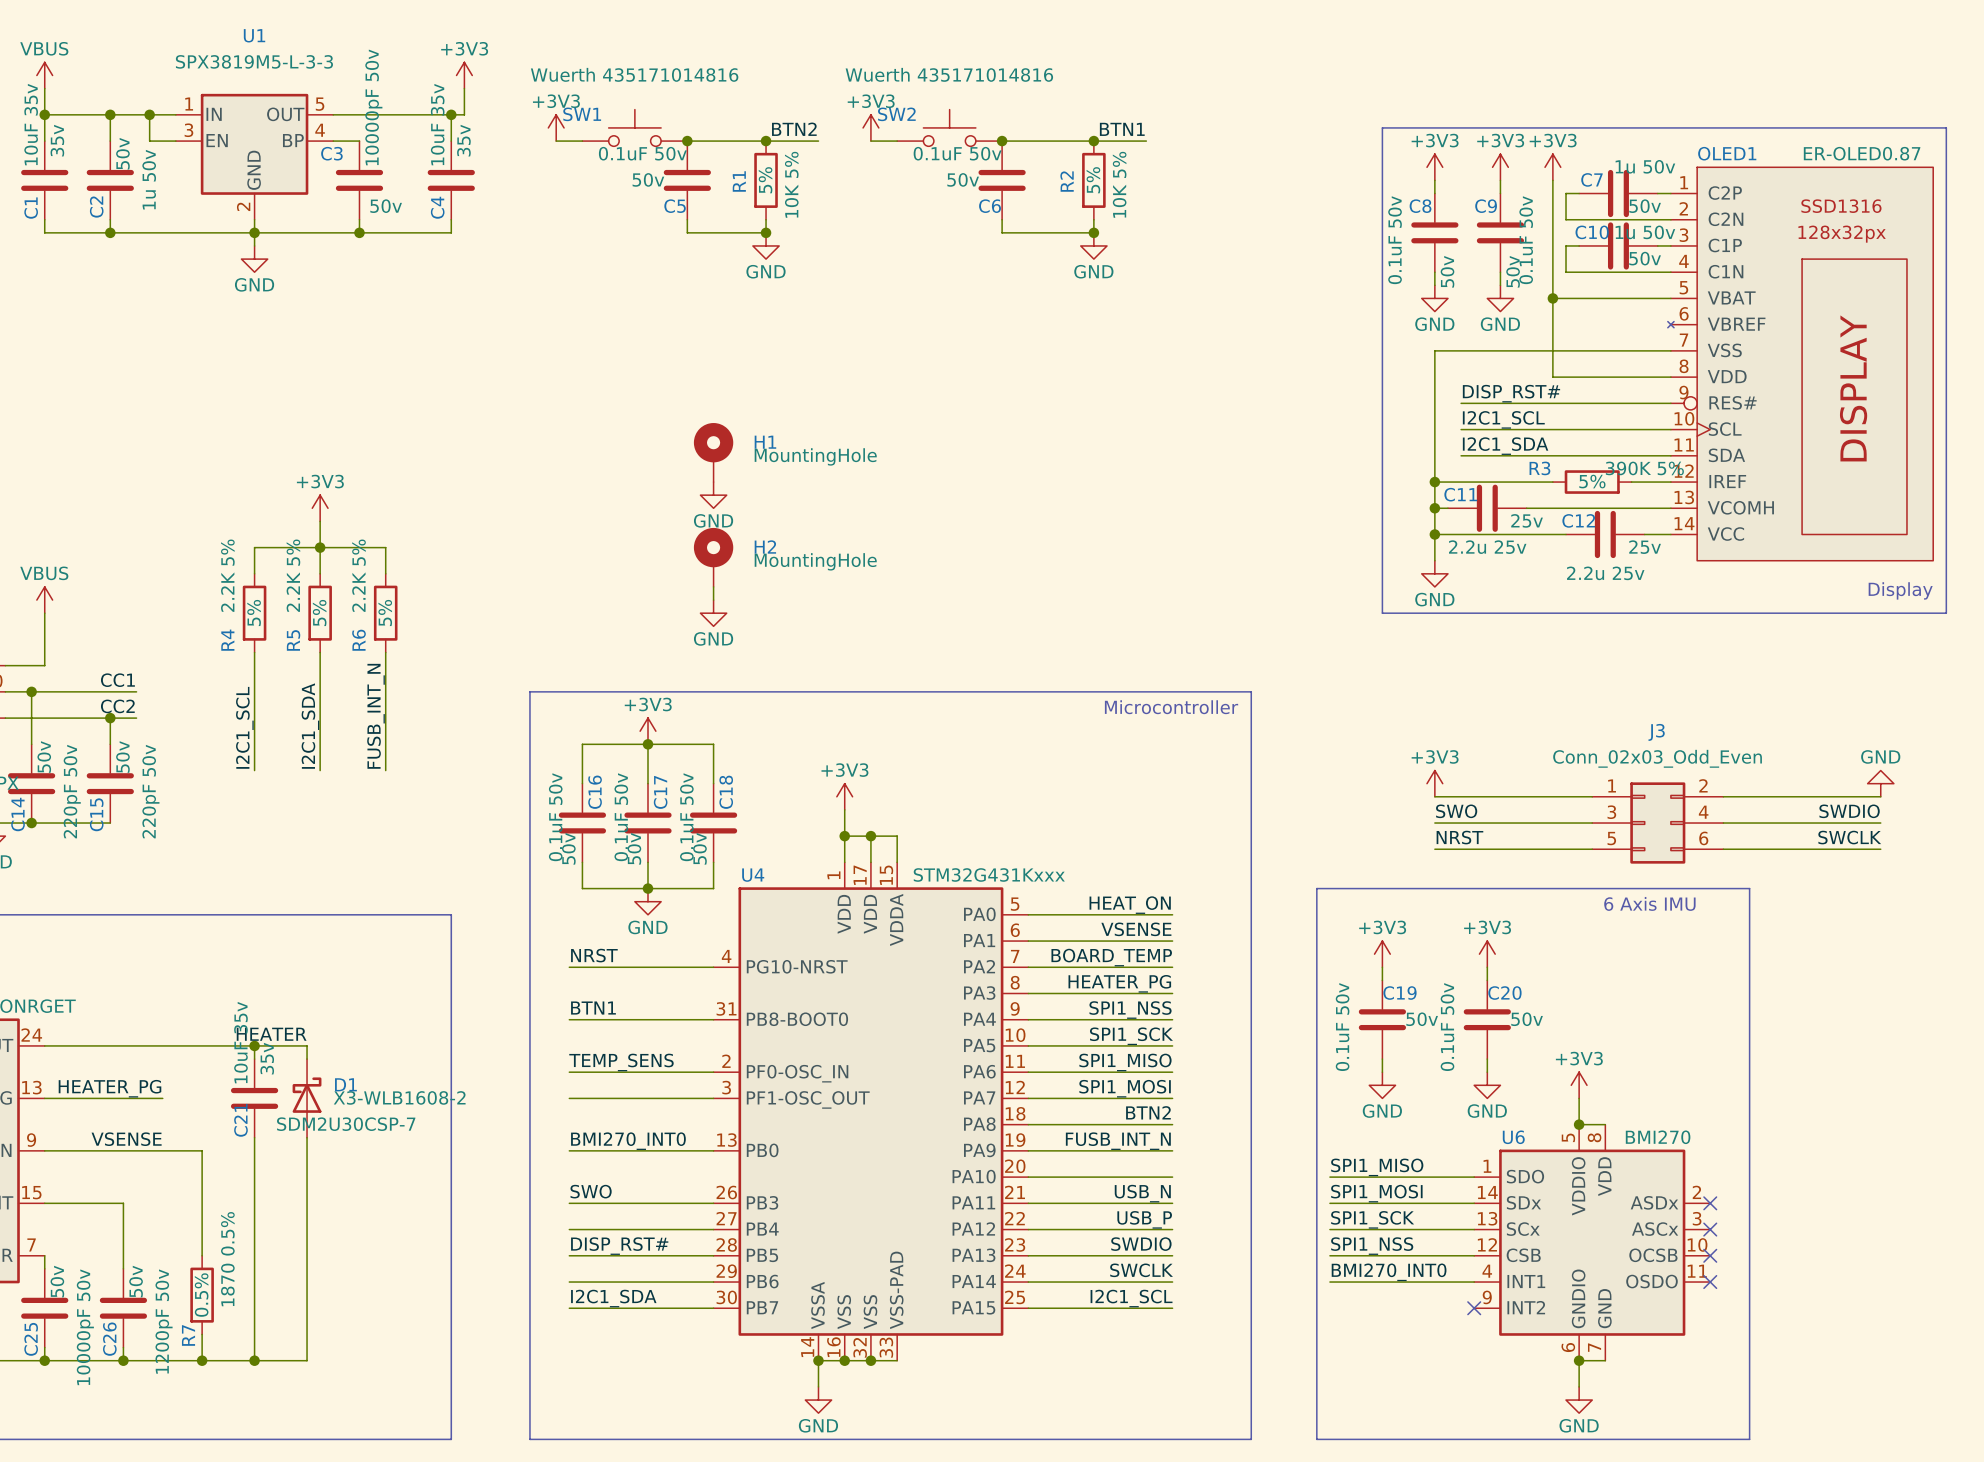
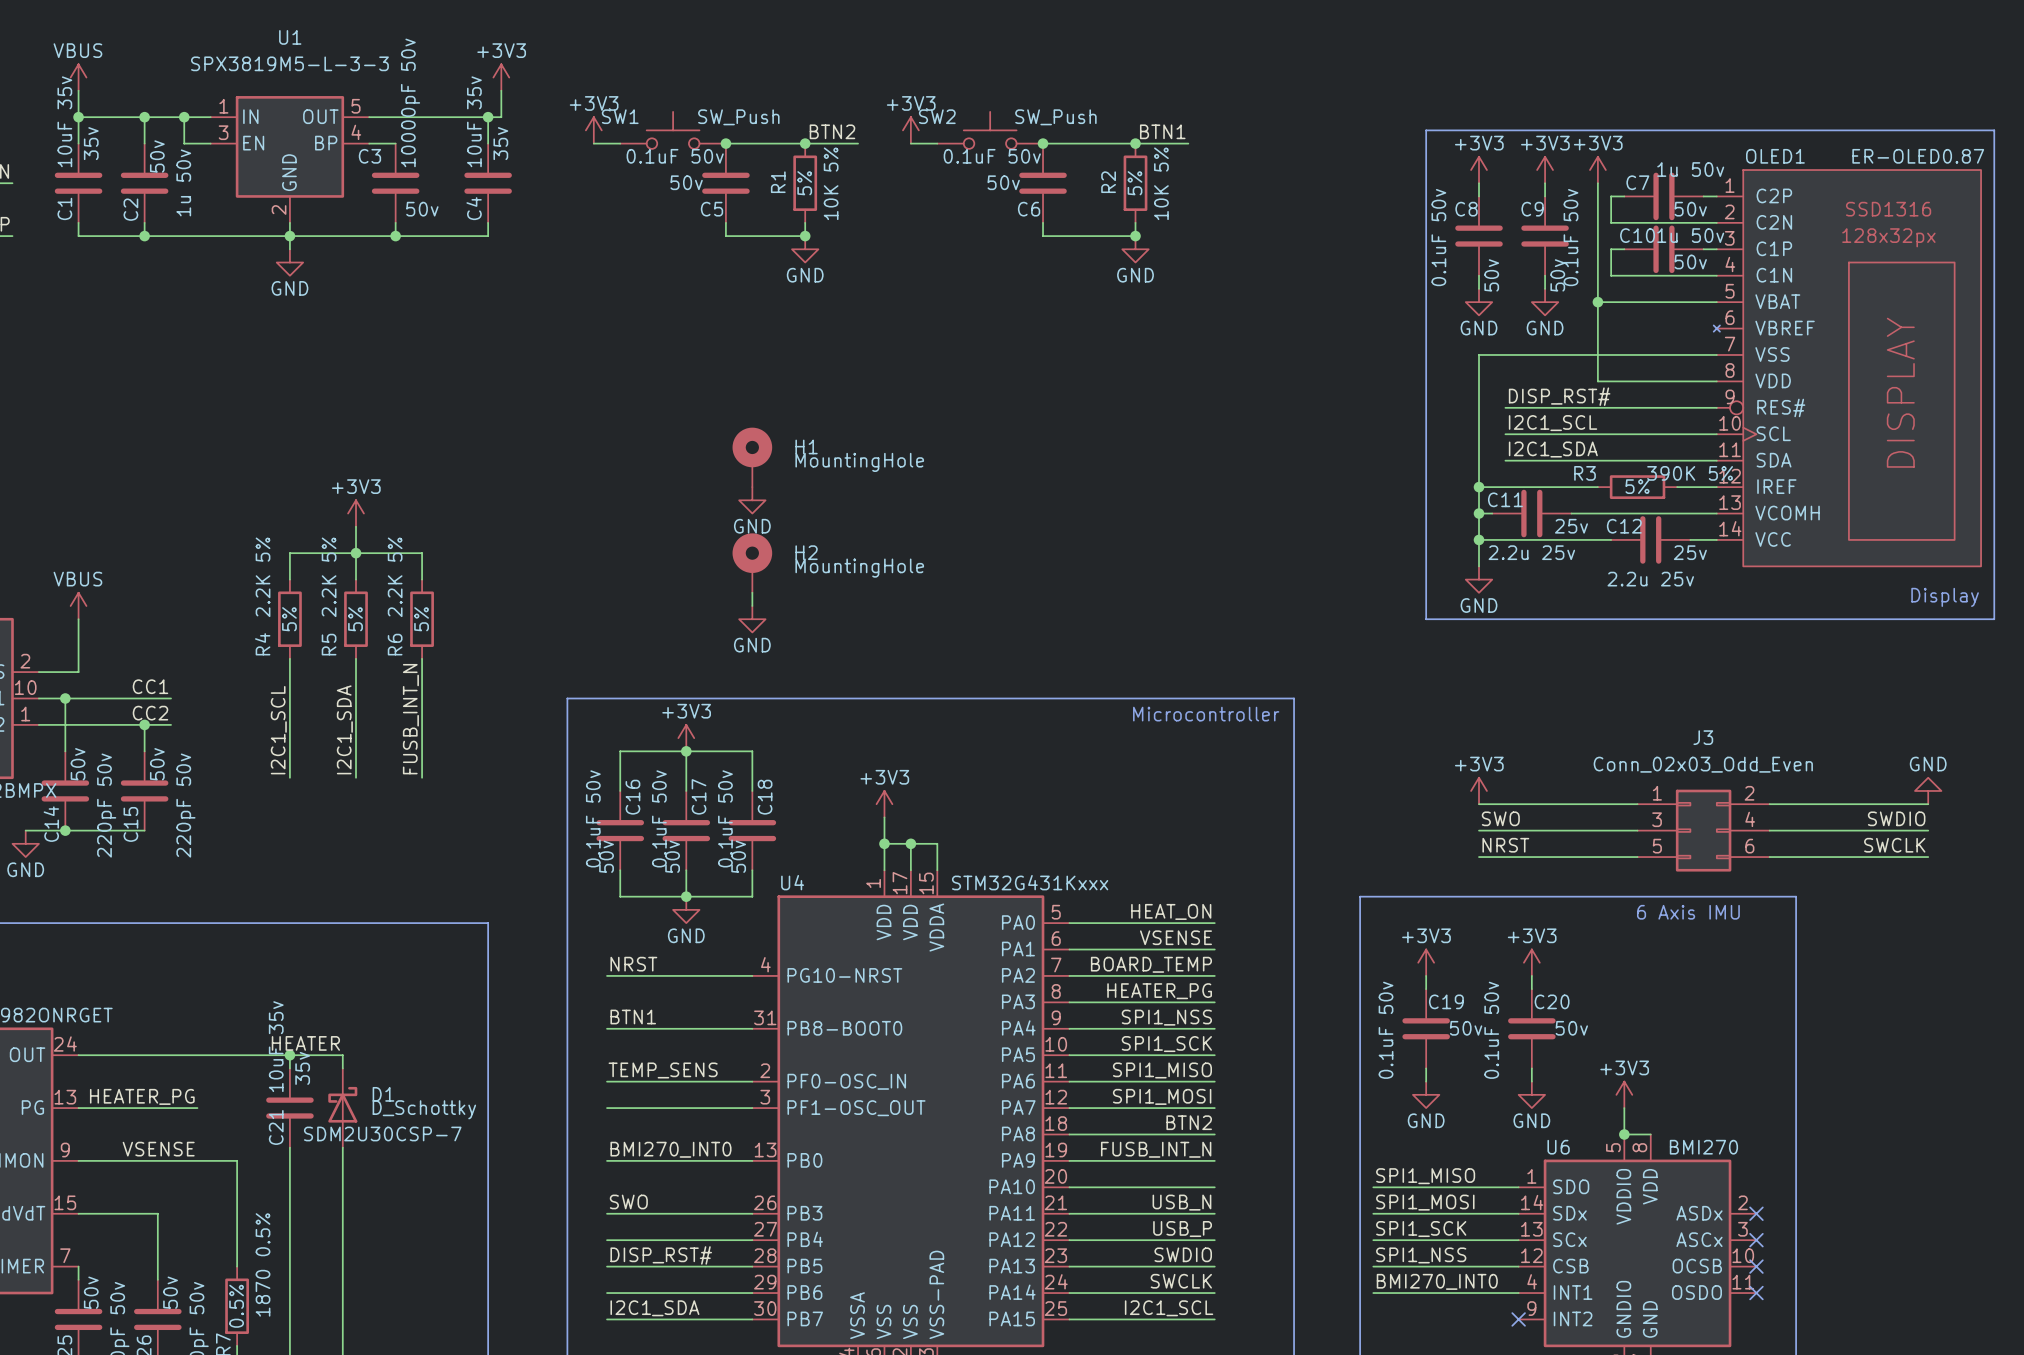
SW1 value: Wuerth 435171014816 (634, 74) -> SW_Push (738, 117)
SW2 value: Wuerth 435171014816 (949, 74) -> SW_Push (1055, 117)
D1 value: X3-WLB1608-2 (399, 1097) -> D_Schottky (424, 1109)

